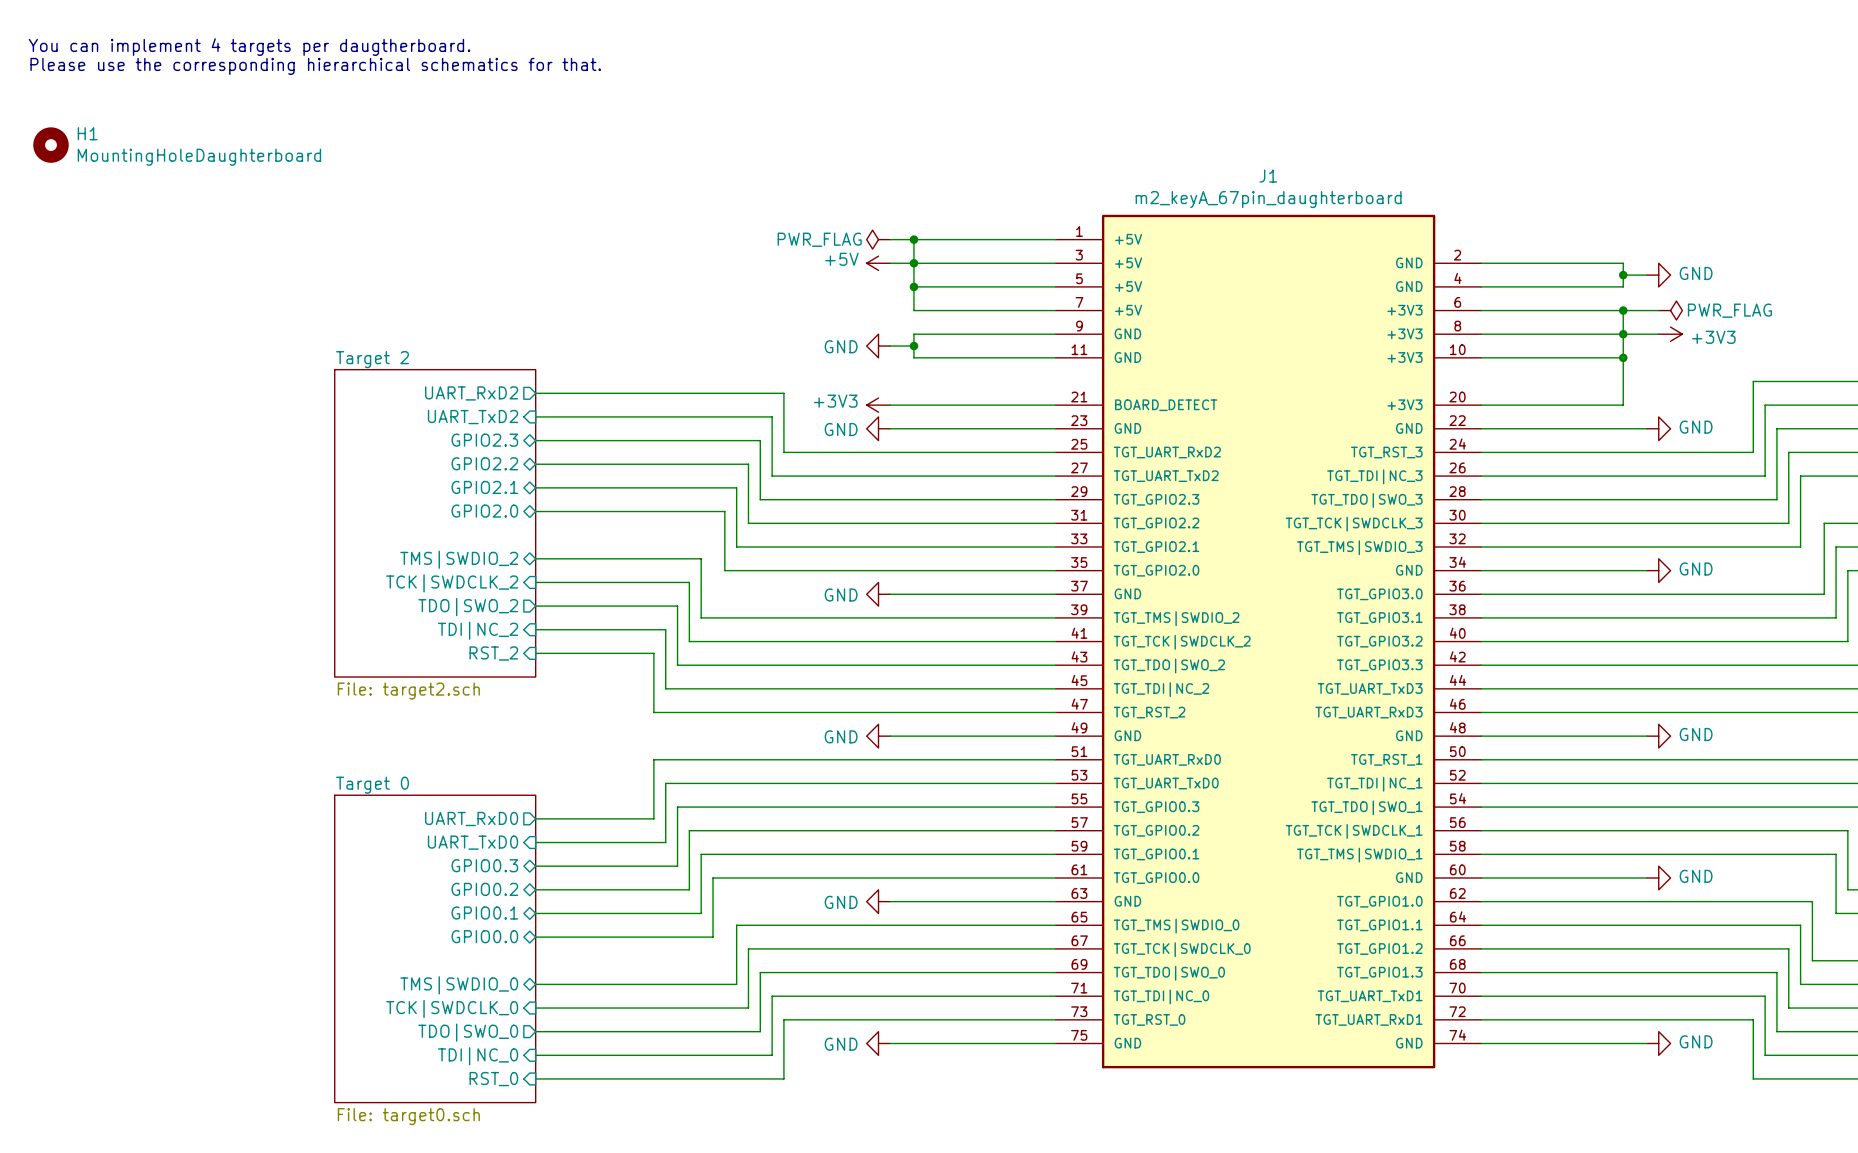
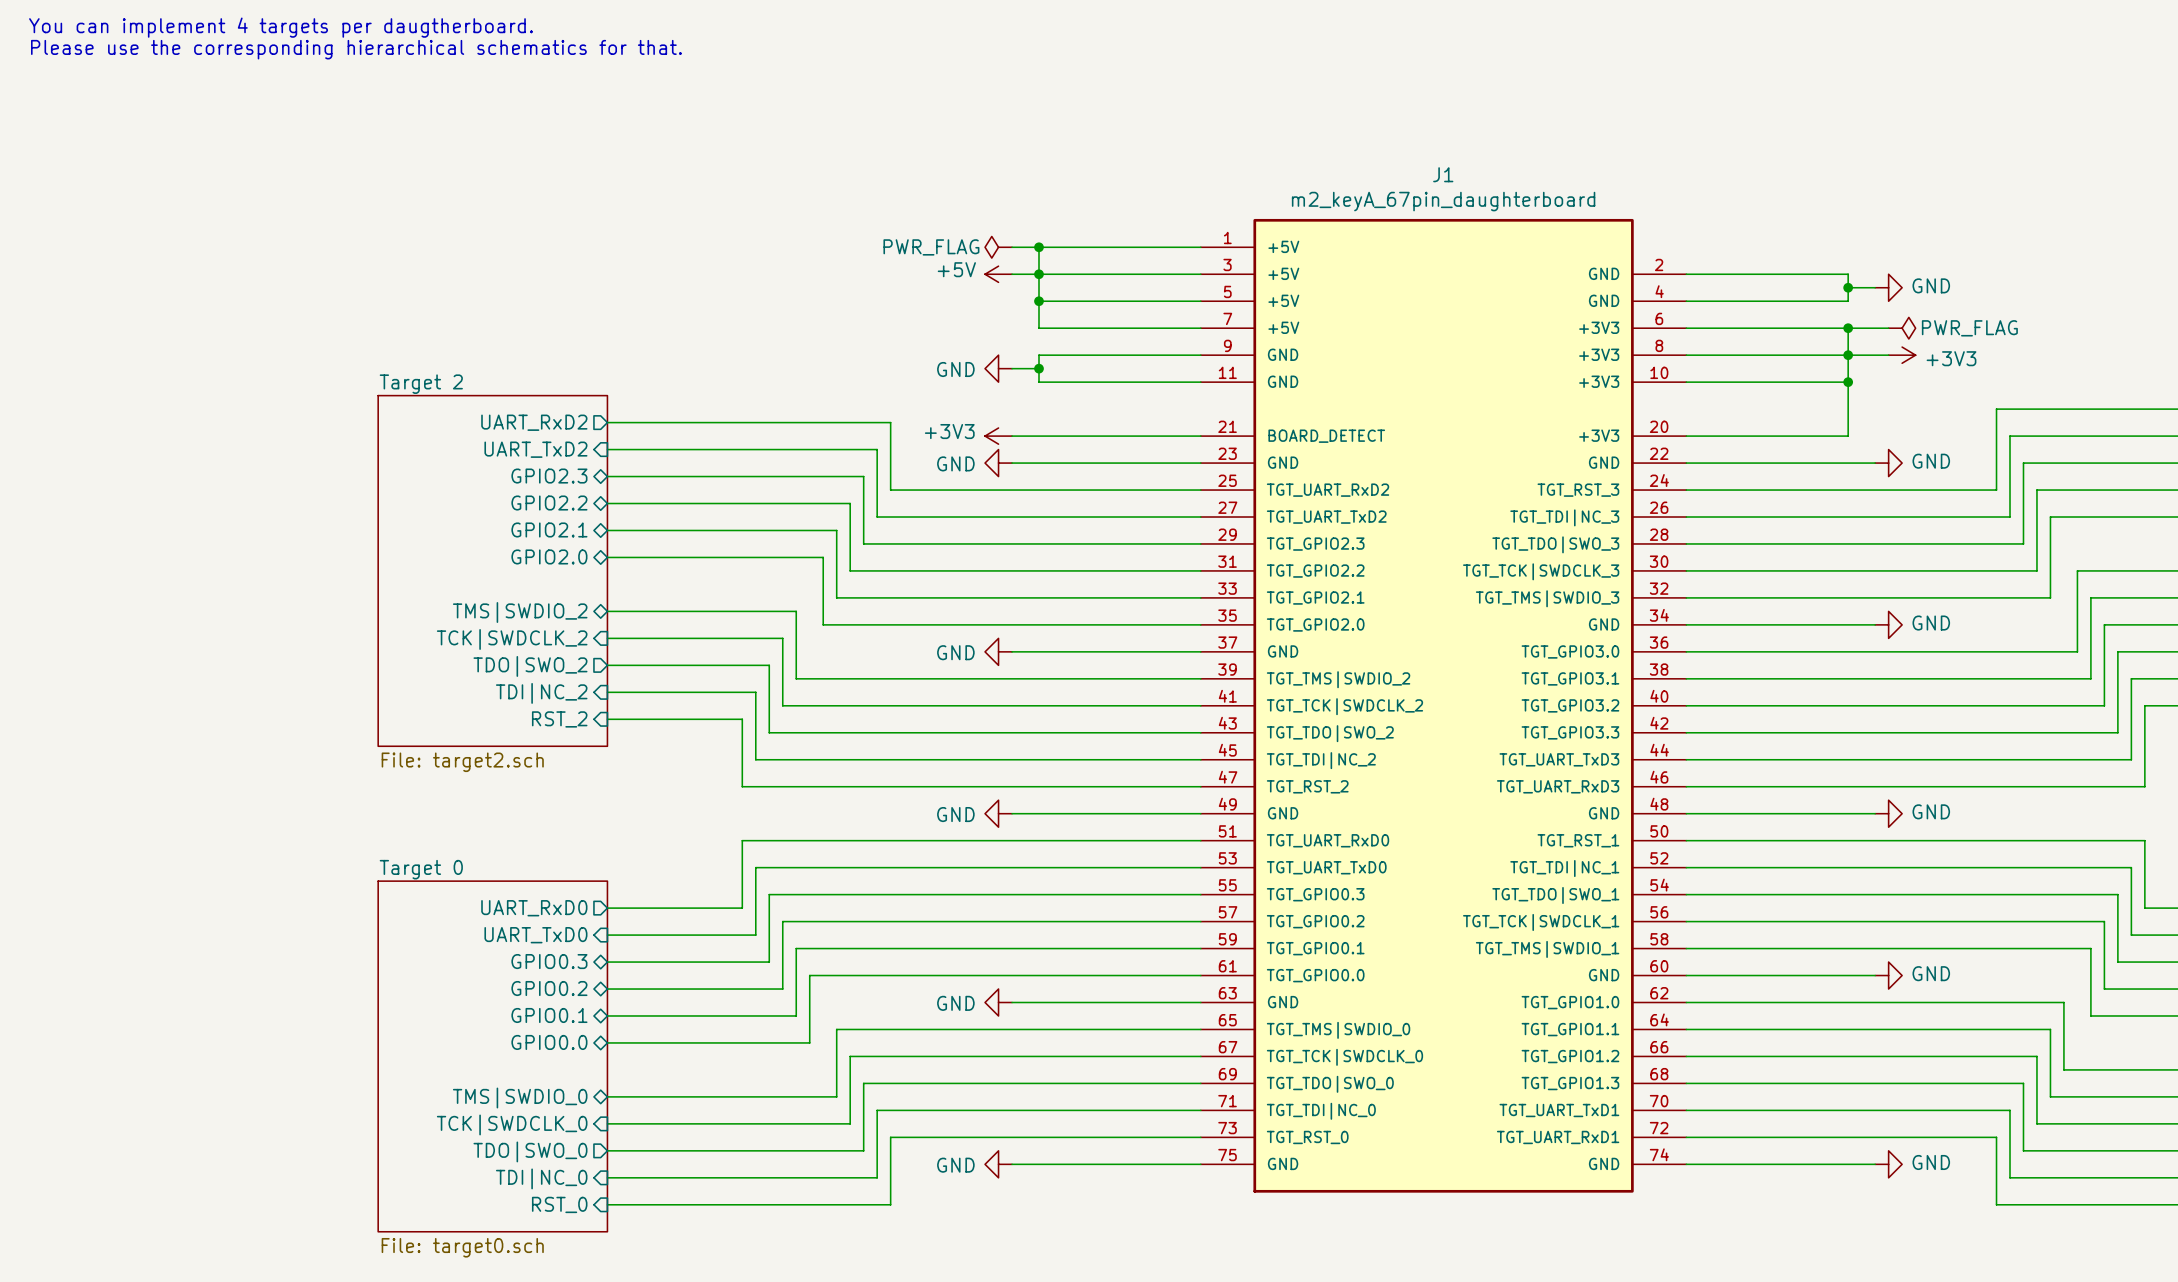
H1: MountingHoleDaughterboard (51, 145) -> none

